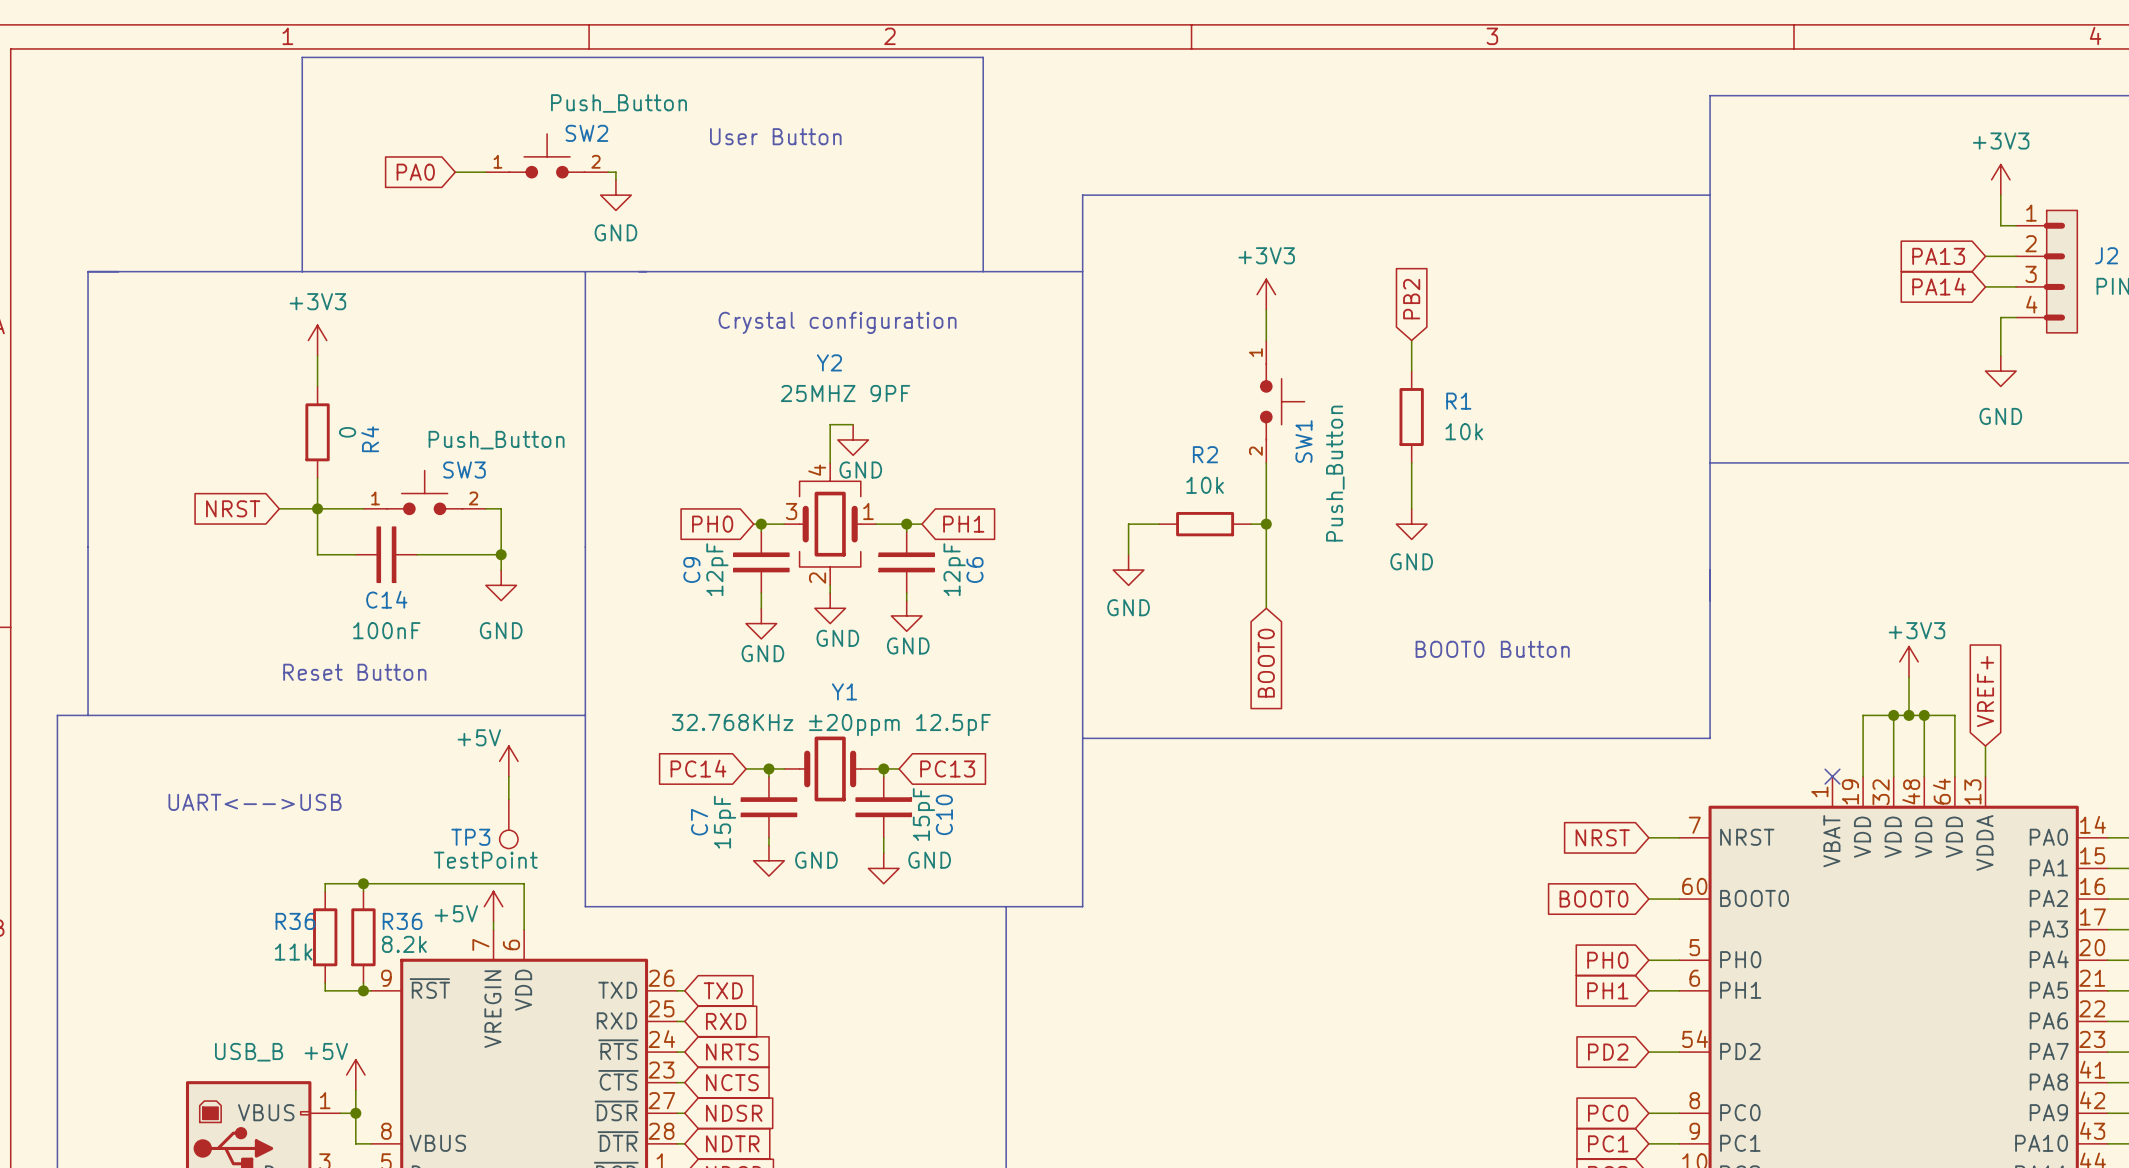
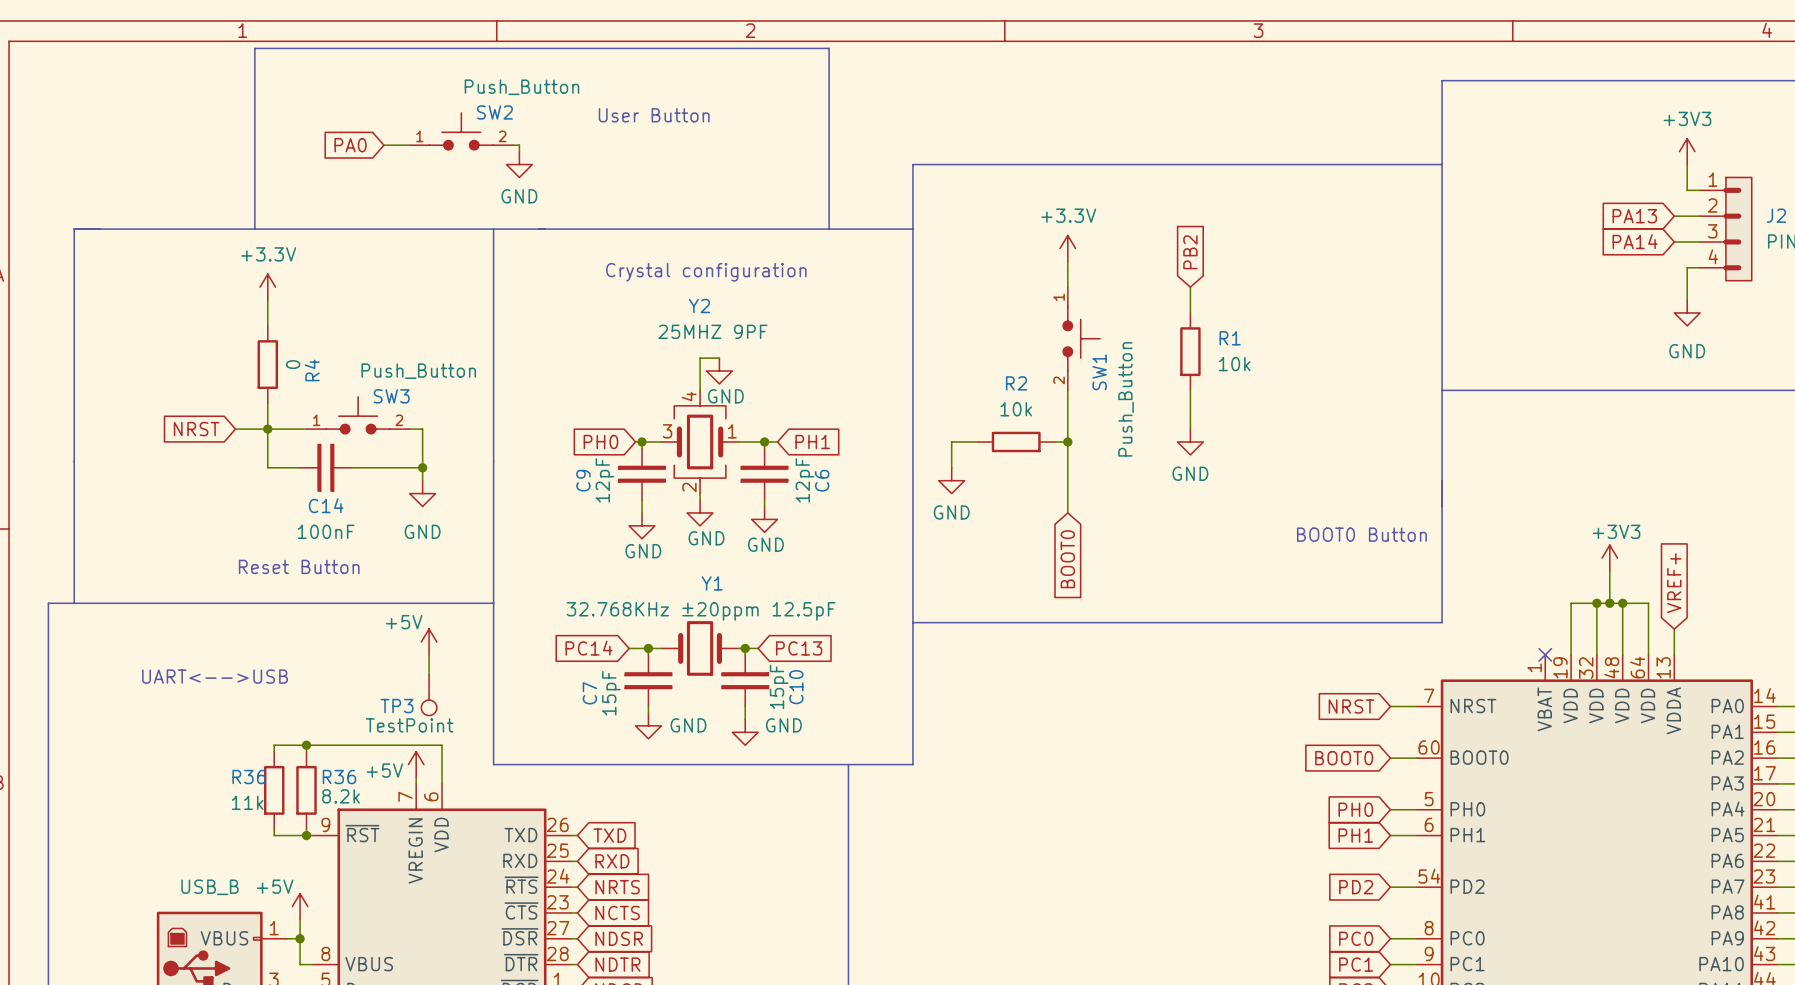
power symbol: +3V3 (1266, 294) -> +3.3V (1067, 248)
power symbol: +3V3 (317, 340) -> +3.3V (267, 287)
text position: BOOT0 Button (1492, 649) -> BOOT0 Button (1361, 534)

